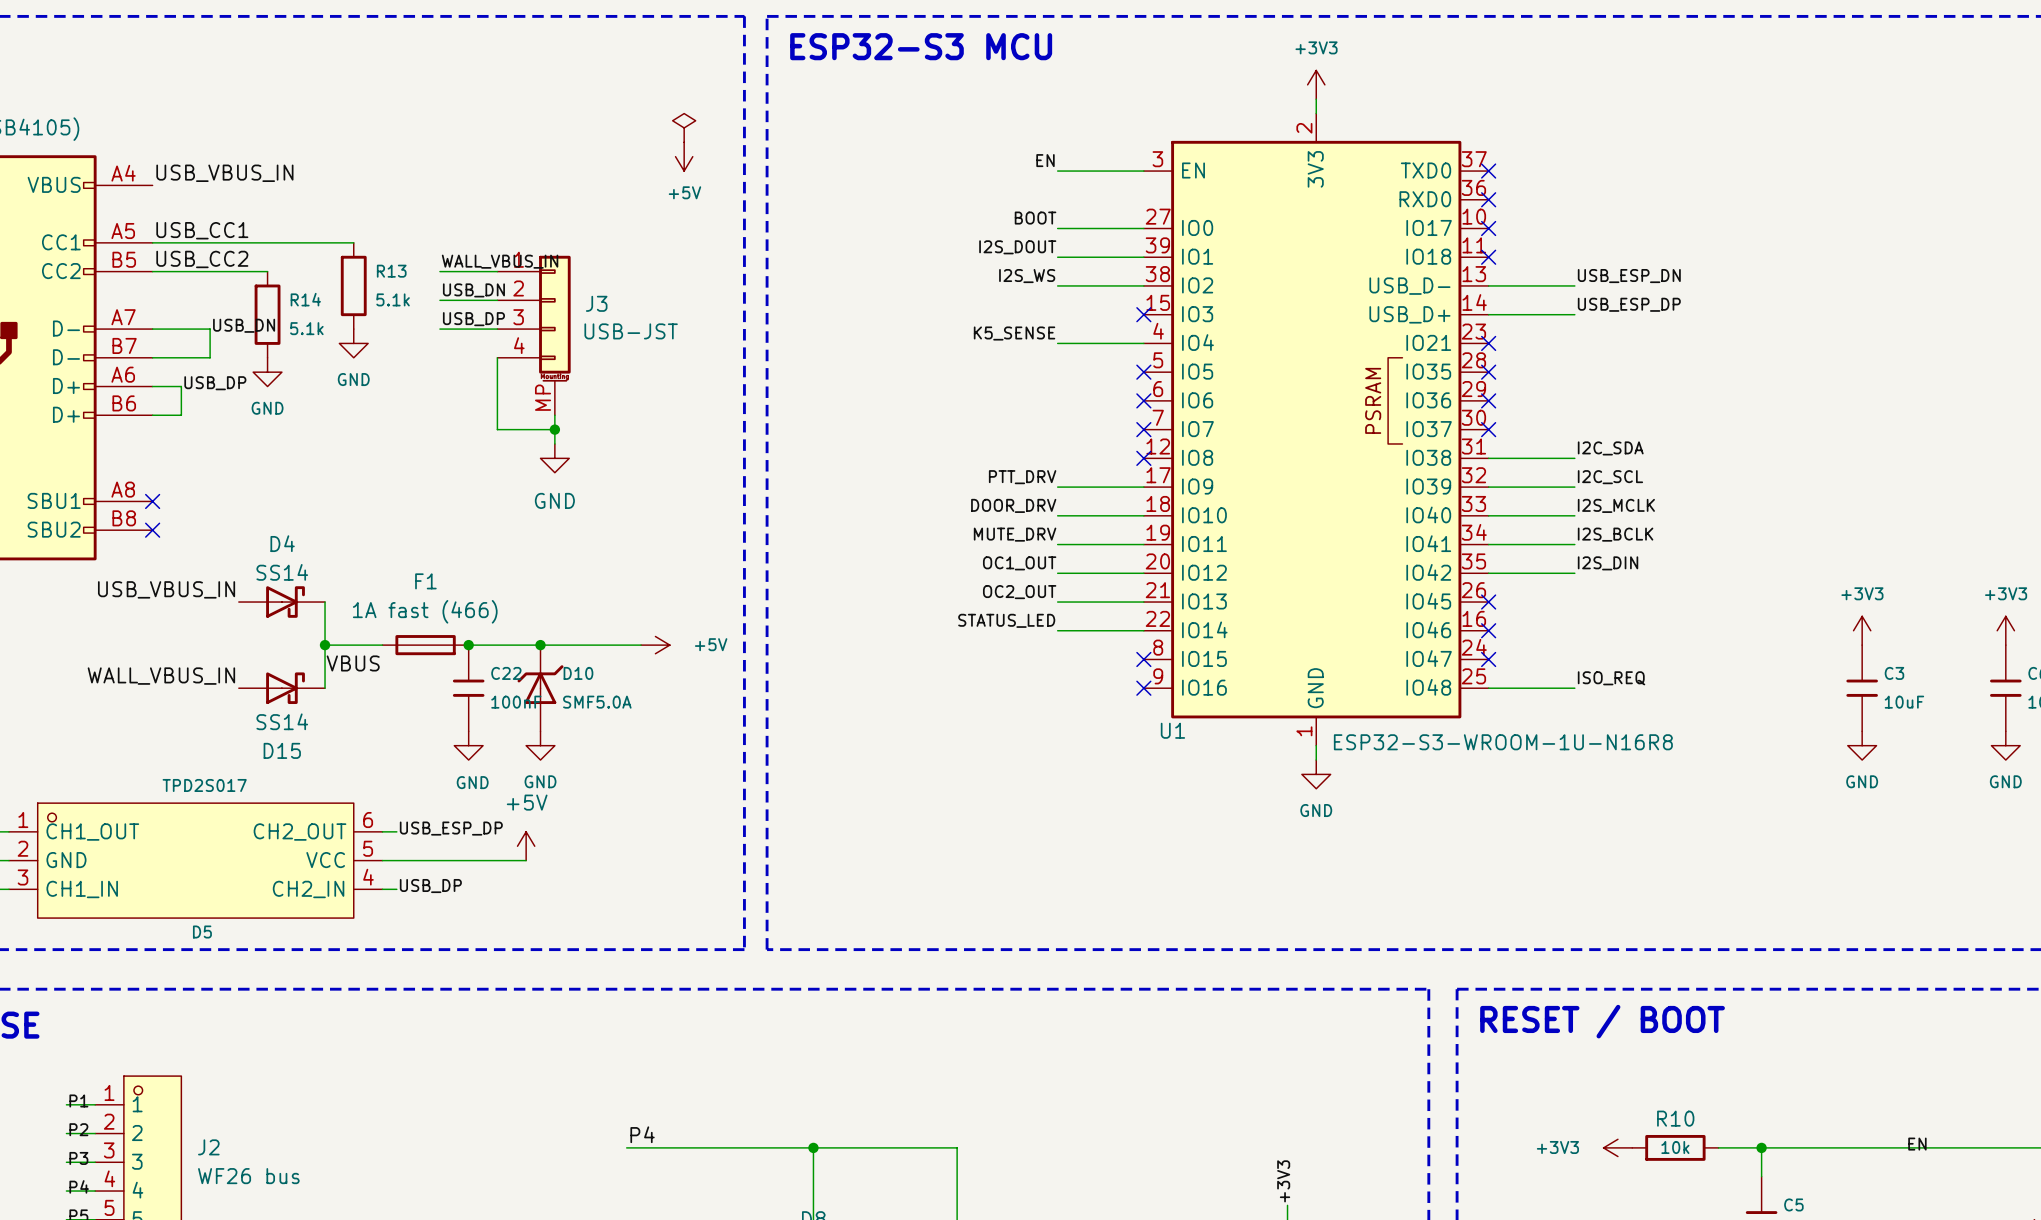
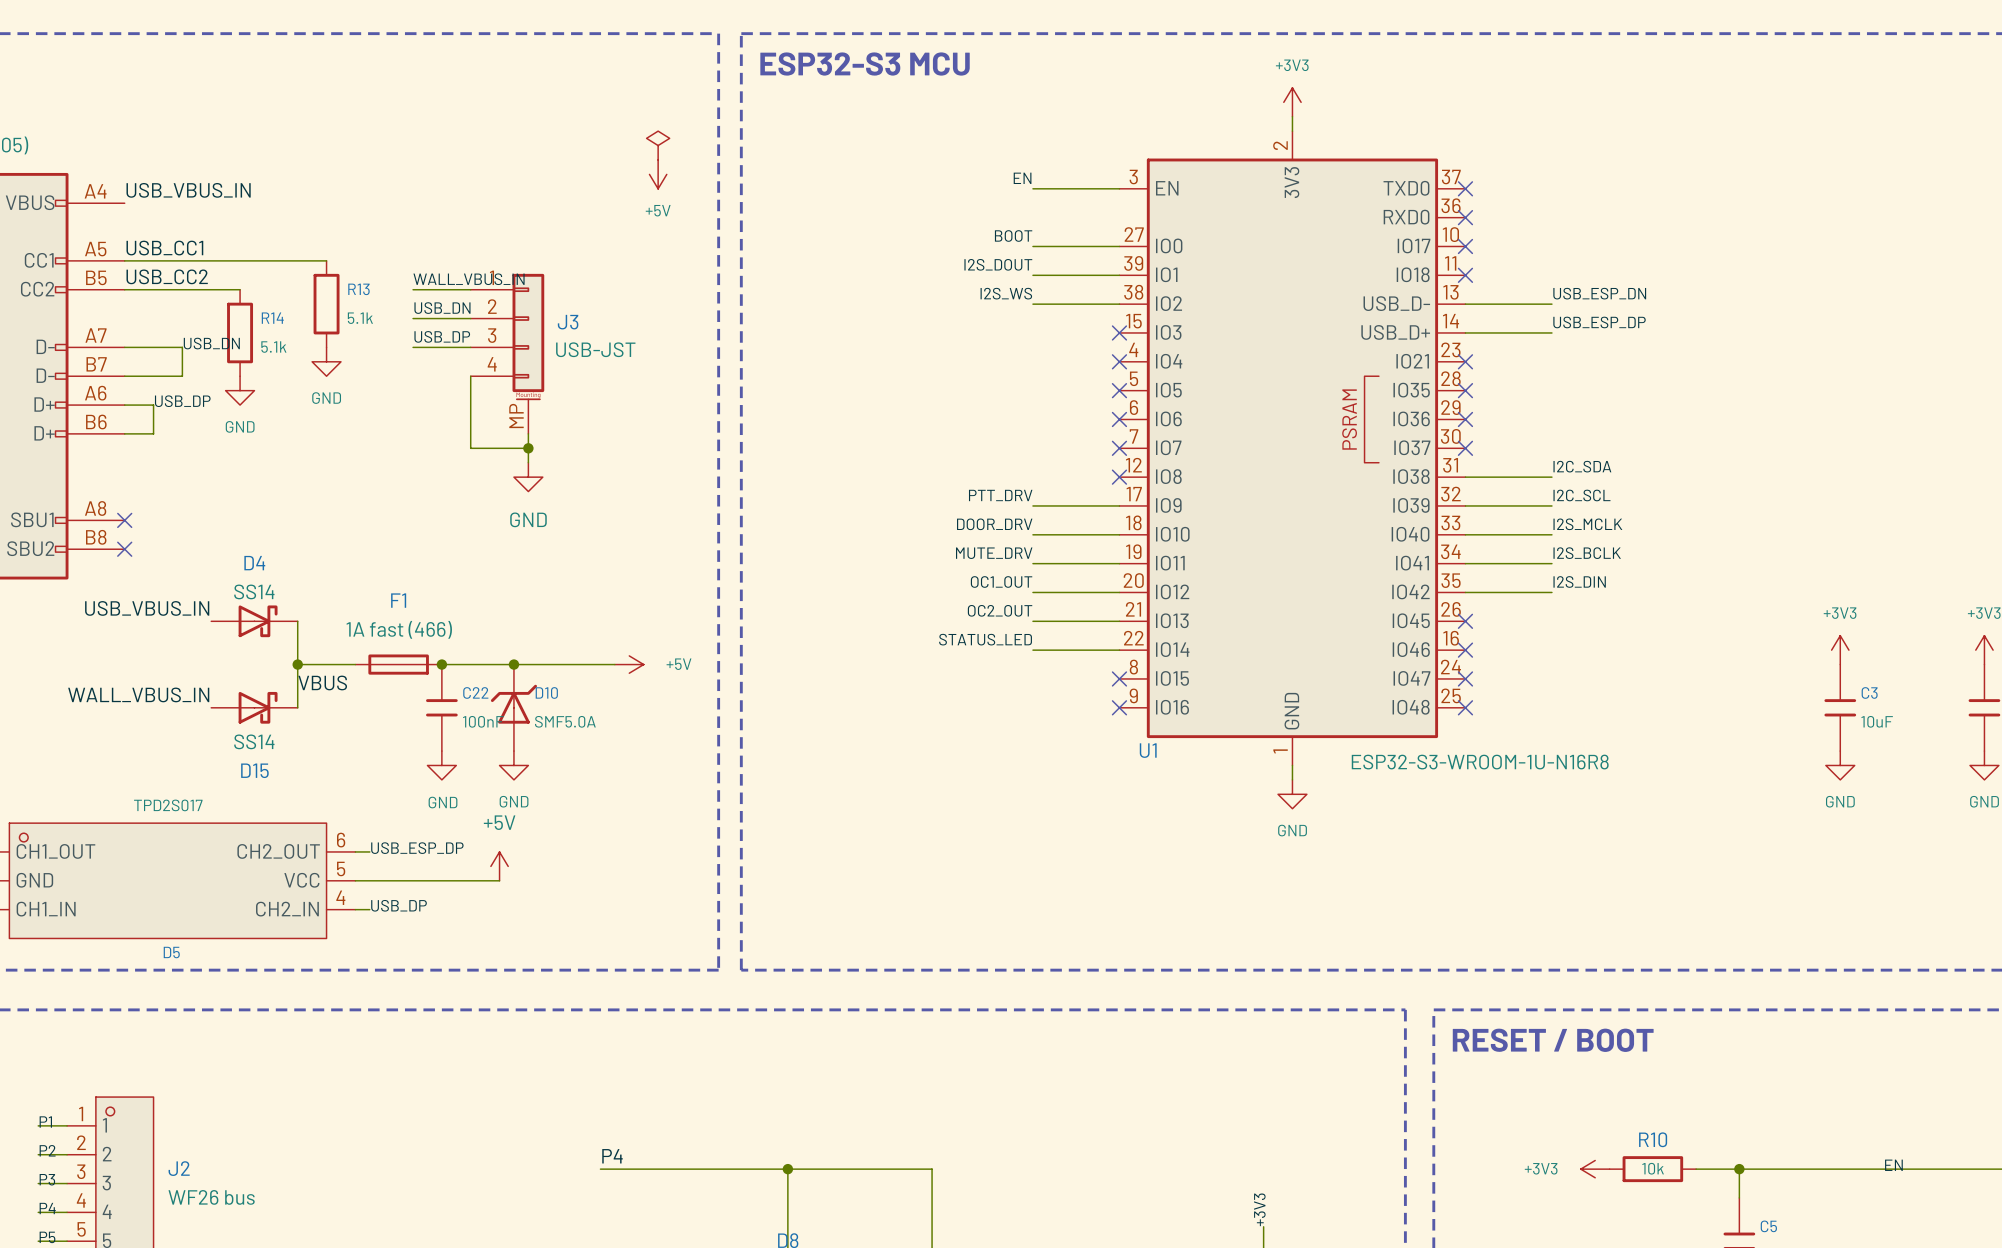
label: K5_SENSE (1014, 333) -> none
wire: (1057, 343) (1143, 343) -> none
no-connect mark: none -> (1119, 361)
label: ISO_REQ (1611, 678) -> none
wire: (1488, 688) (1574, 688) -> none
no-connect mark: none -> (1465, 707)

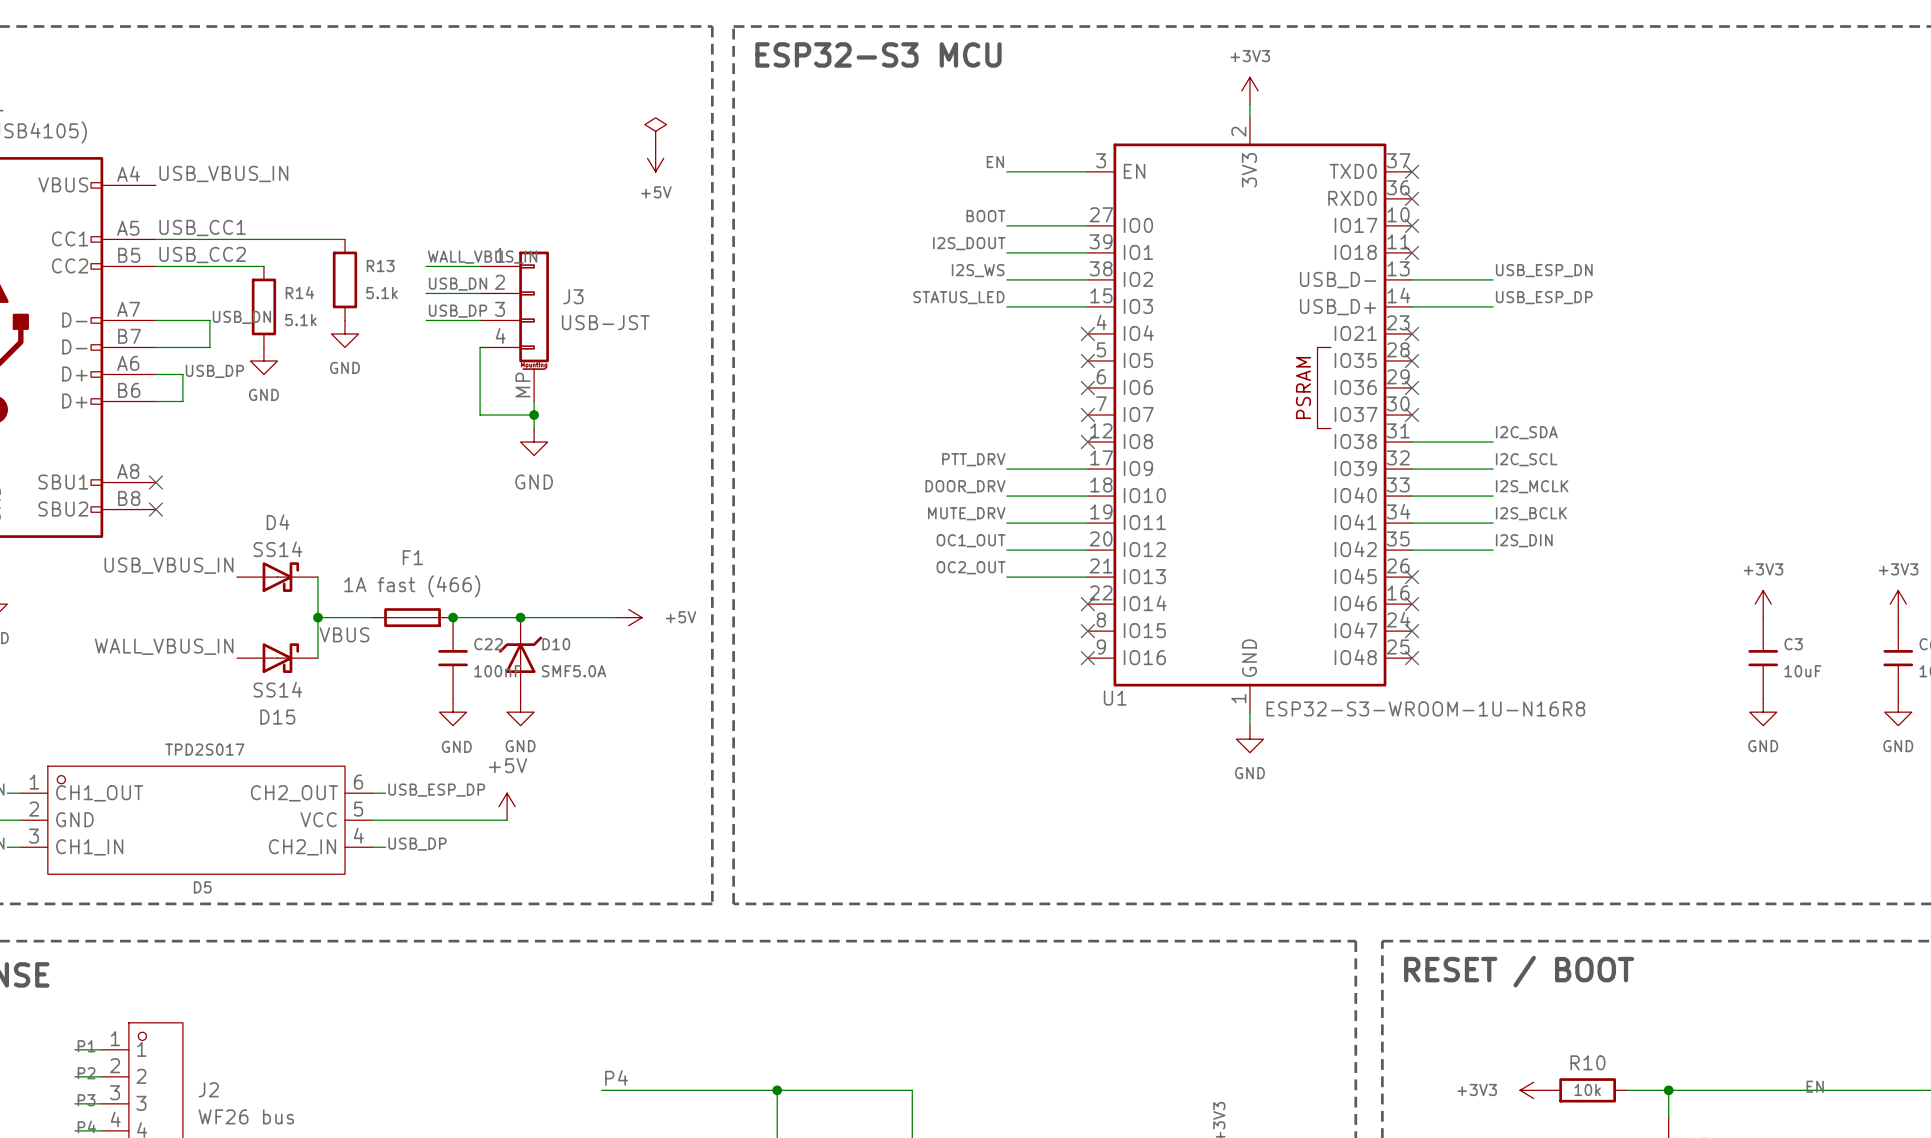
label: none -> STATUS_LED (958, 297)
wire: none -> (1006, 306) (1087, 306)
no-connect mark: (1119, 332) -> none
label: STATUS_LED (985, 639) -> none
wire: (1032, 650) (1119, 650) -> none
no-connect mark: none -> (1087, 604)

